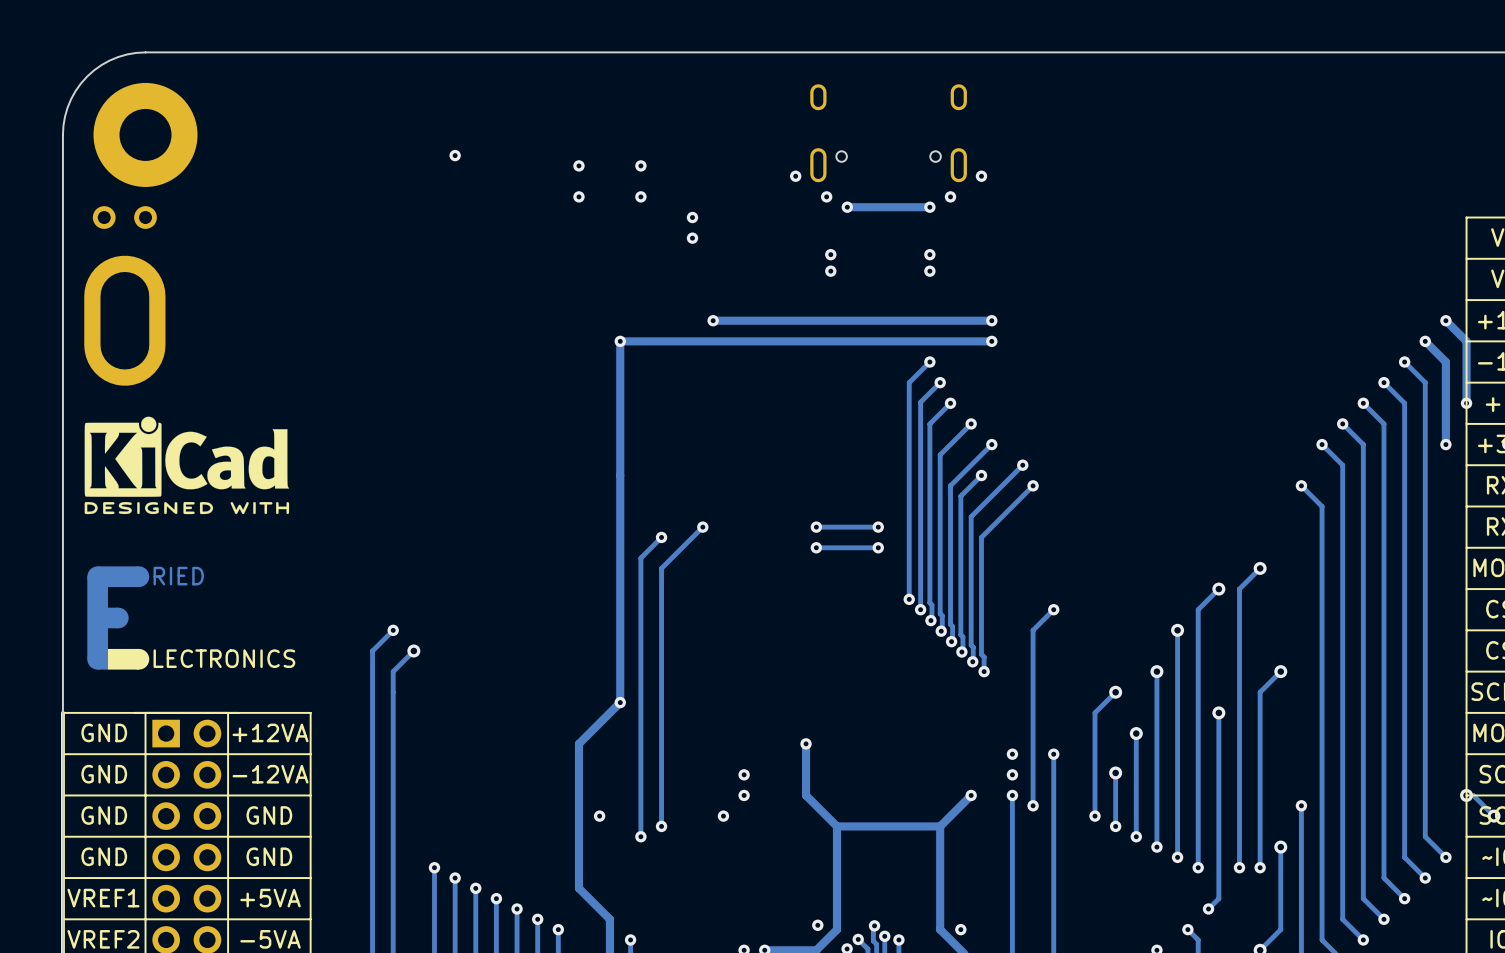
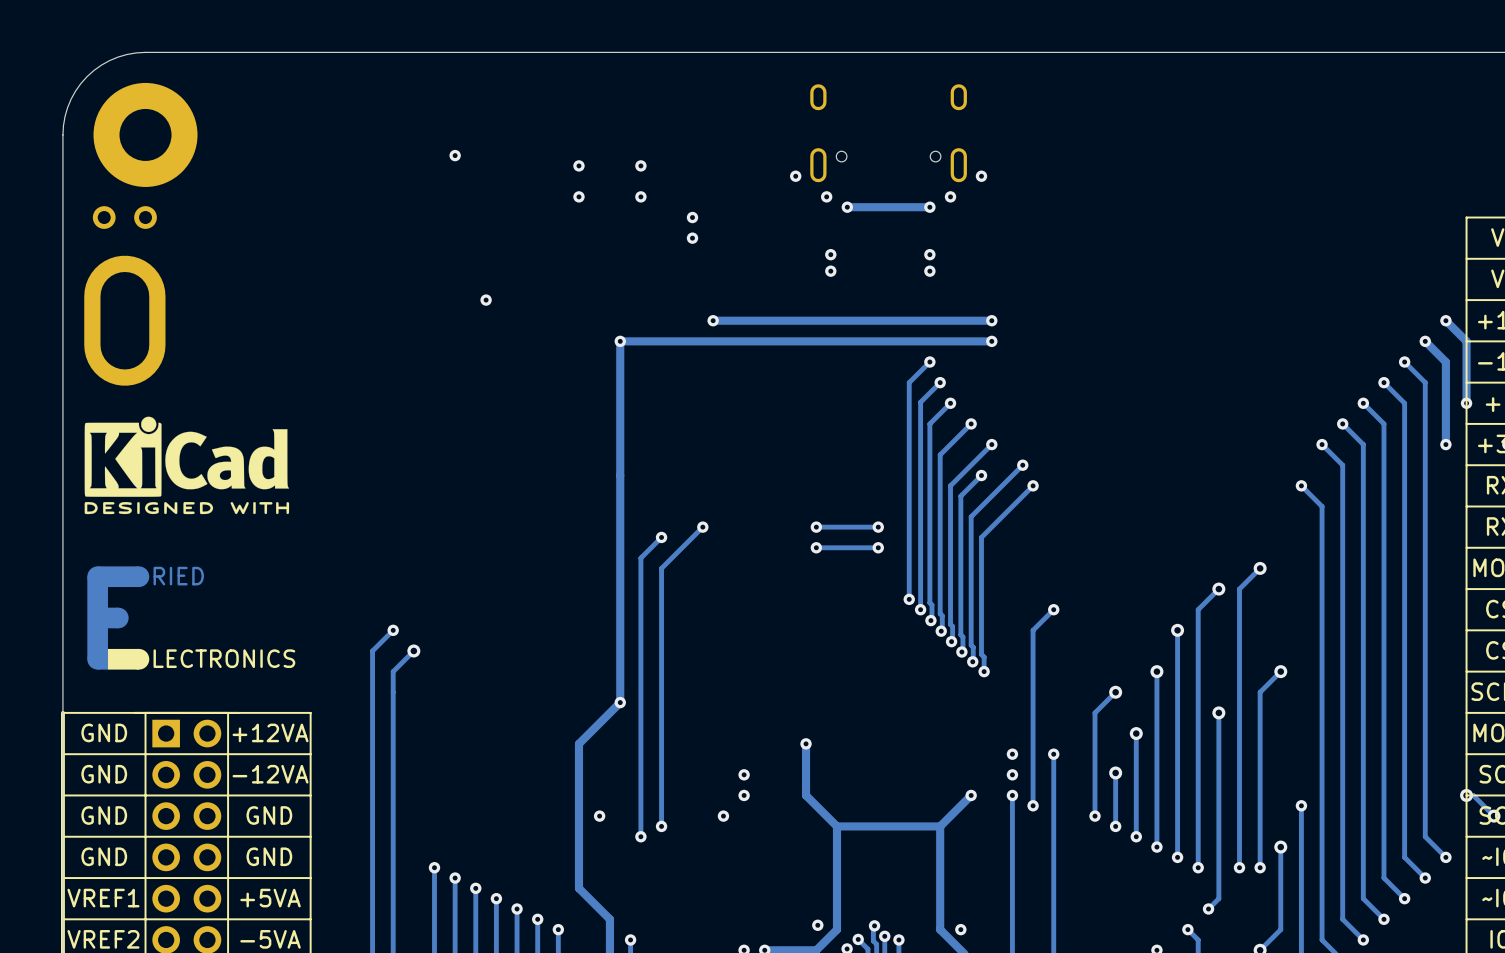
via: none -> (486, 300)

